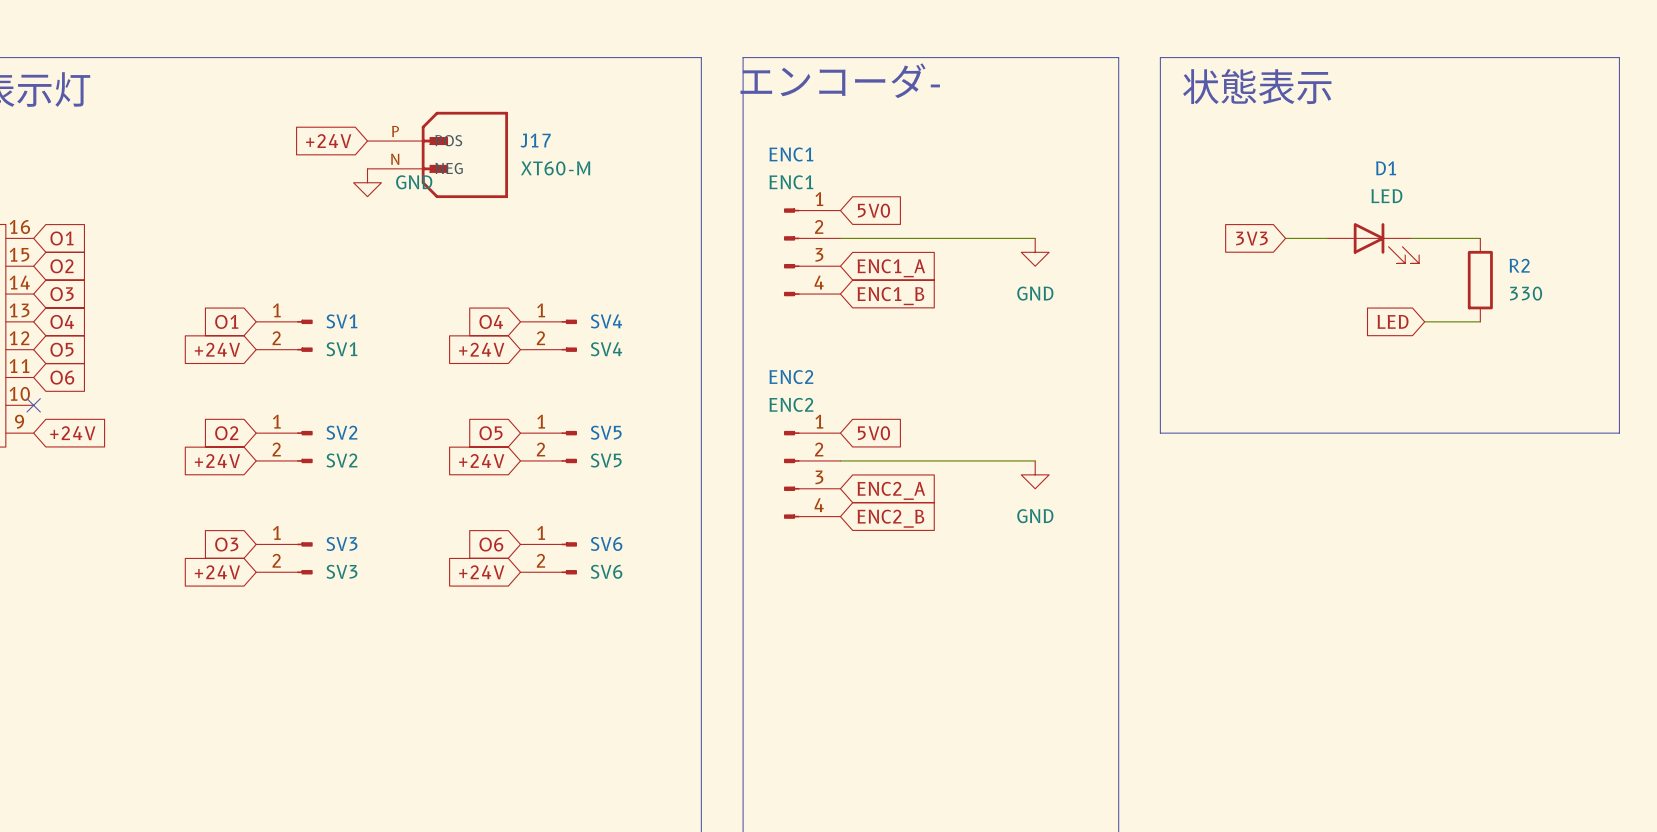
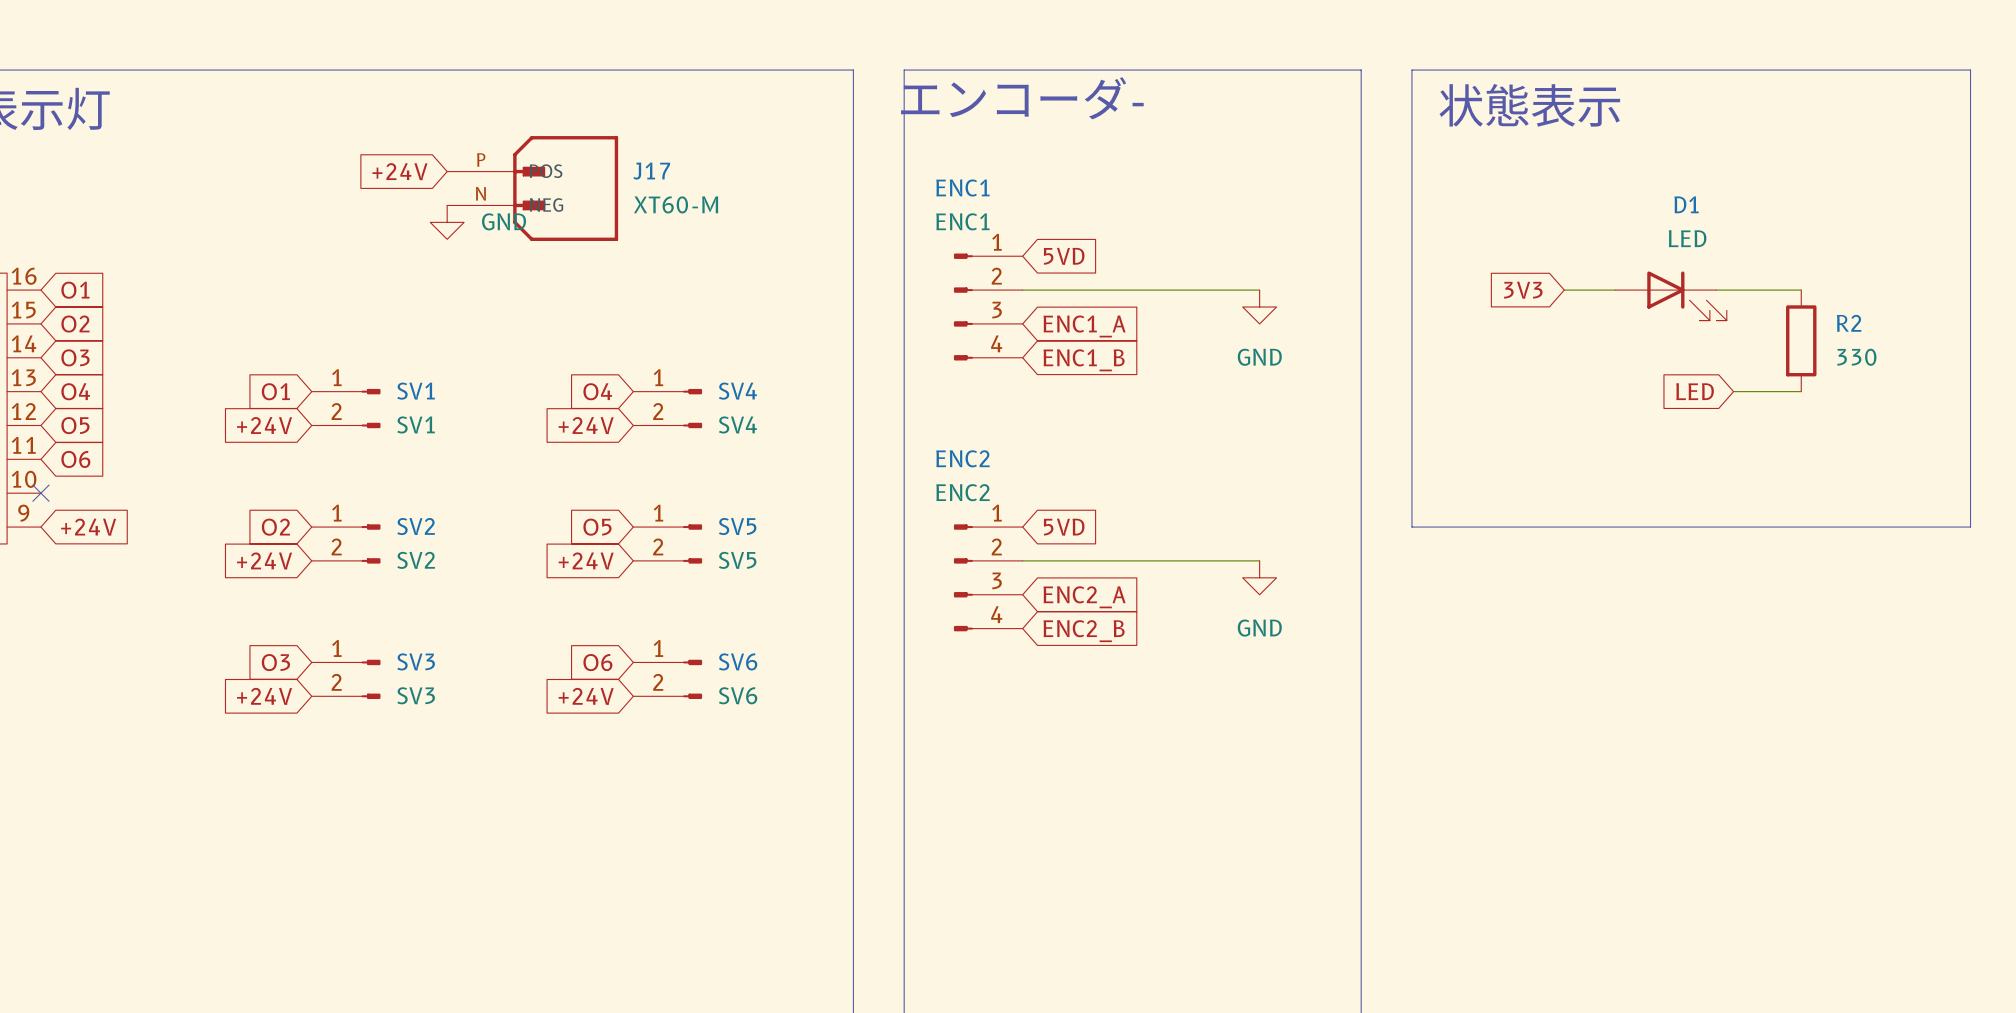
global label: 5V0 (874, 210) -> 5VD (1064, 256)
global label: 5V0 (874, 433) -> 5VD (1064, 527)

